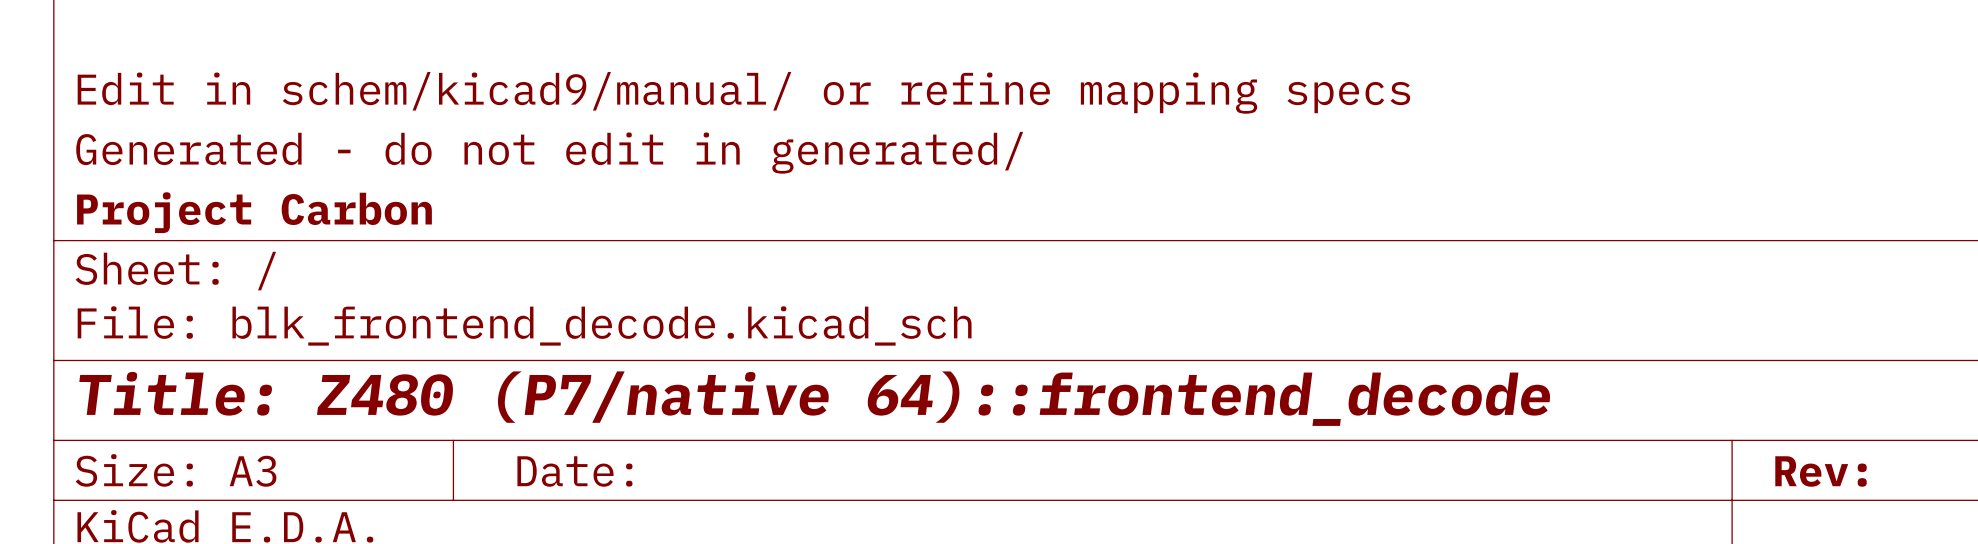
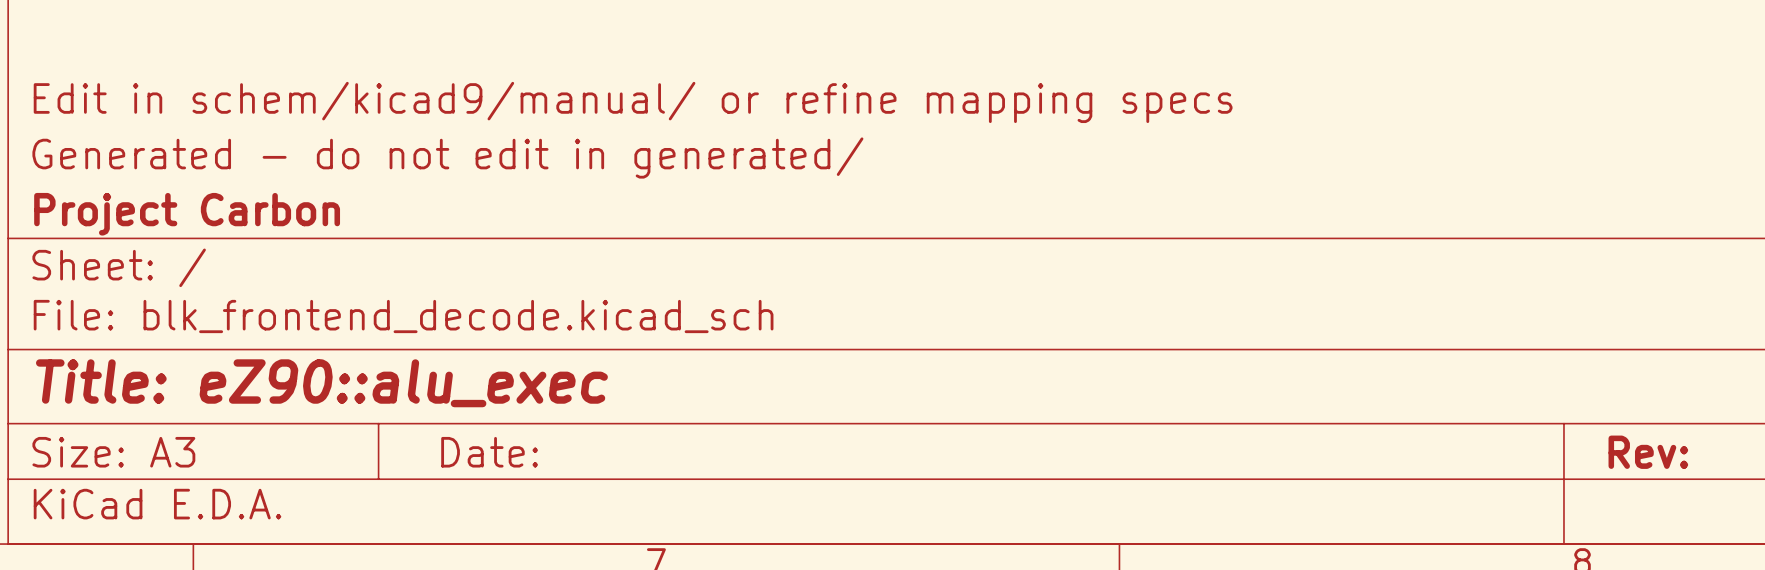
title block: Title: Z480 (P7/native 64)::frontend_decode (814, 398) -> Title: eZ90::alu_exec (321, 383)

